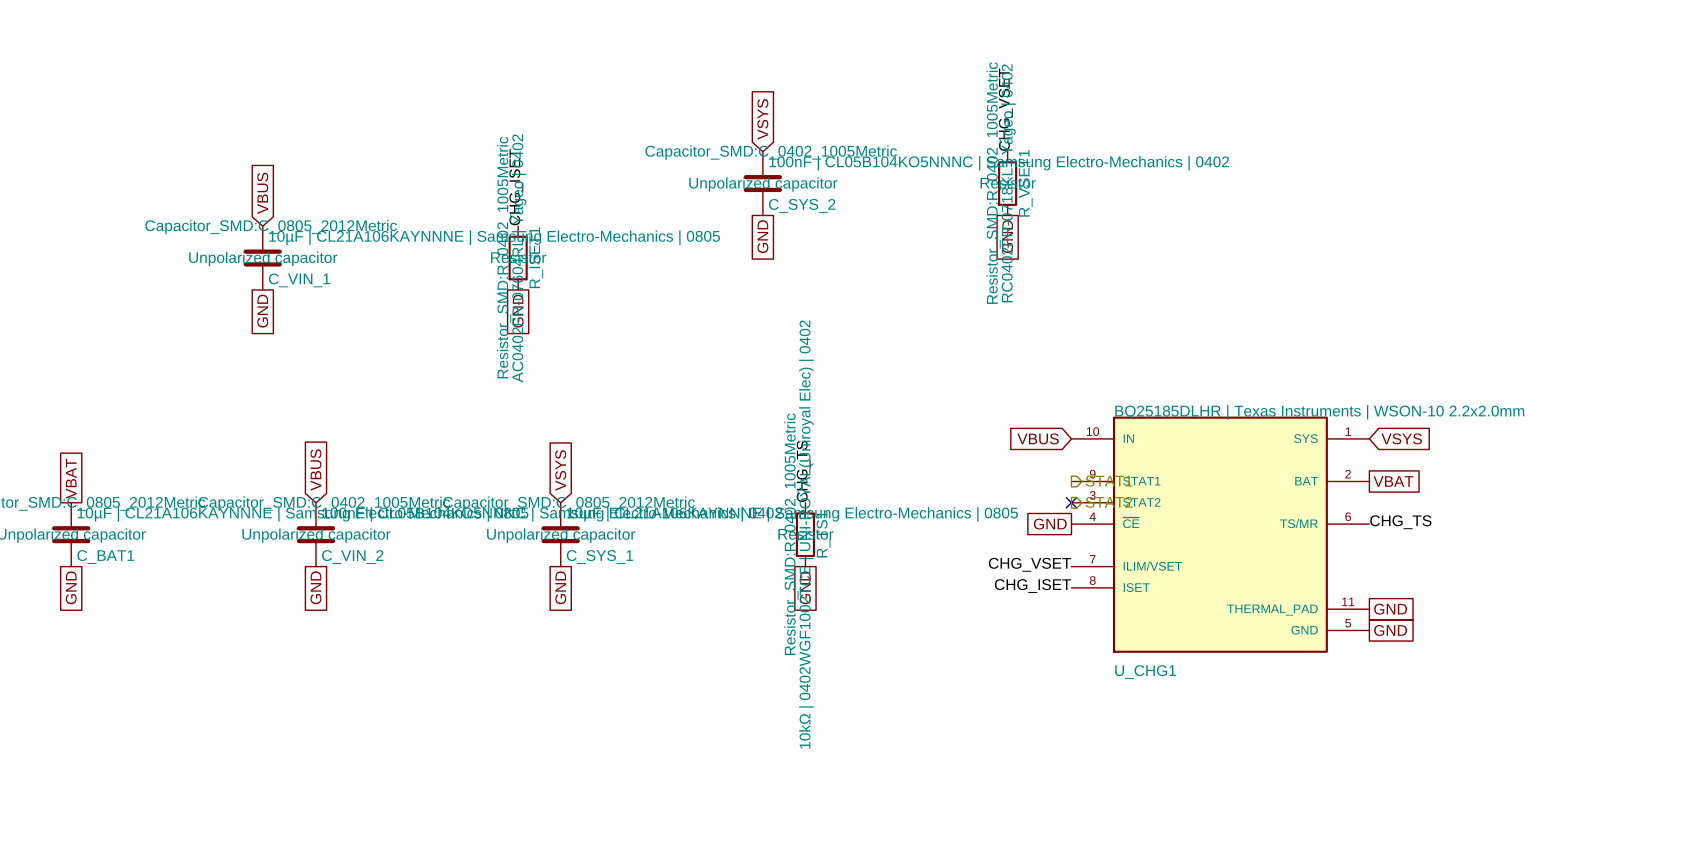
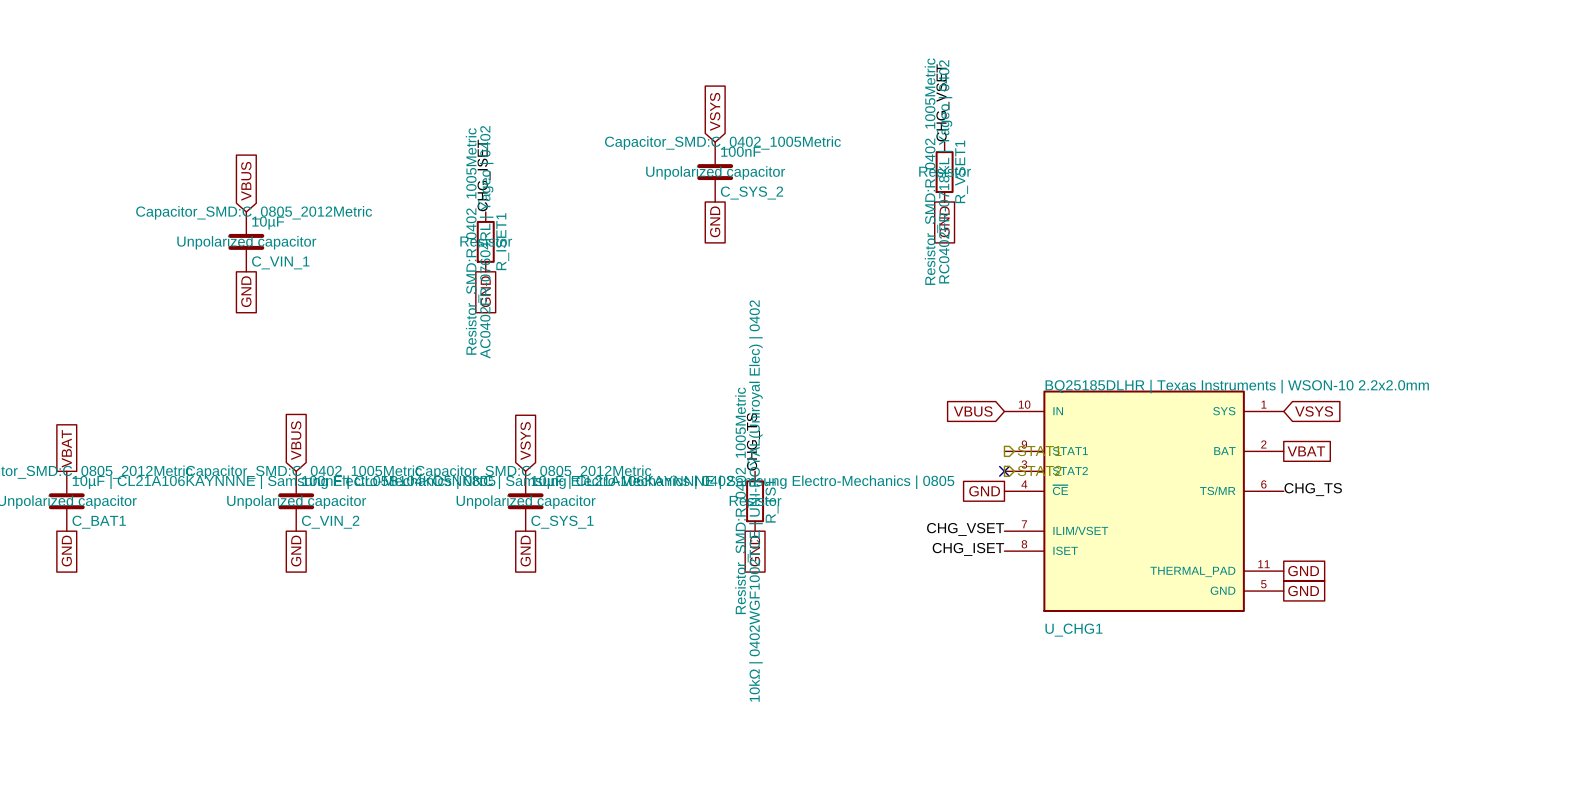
C_SYS_2 value: 100nF | CL05B104KO5NNNC | Samsung Electro-Mechanics | 0402 (999, 163) -> 100nF (740, 151)
C_VIN_1 value: 10µF | CL21A106KAYNNNE | Samsung Electro-Mechanics | 0805 (494, 237) -> 10µF (268, 223)

